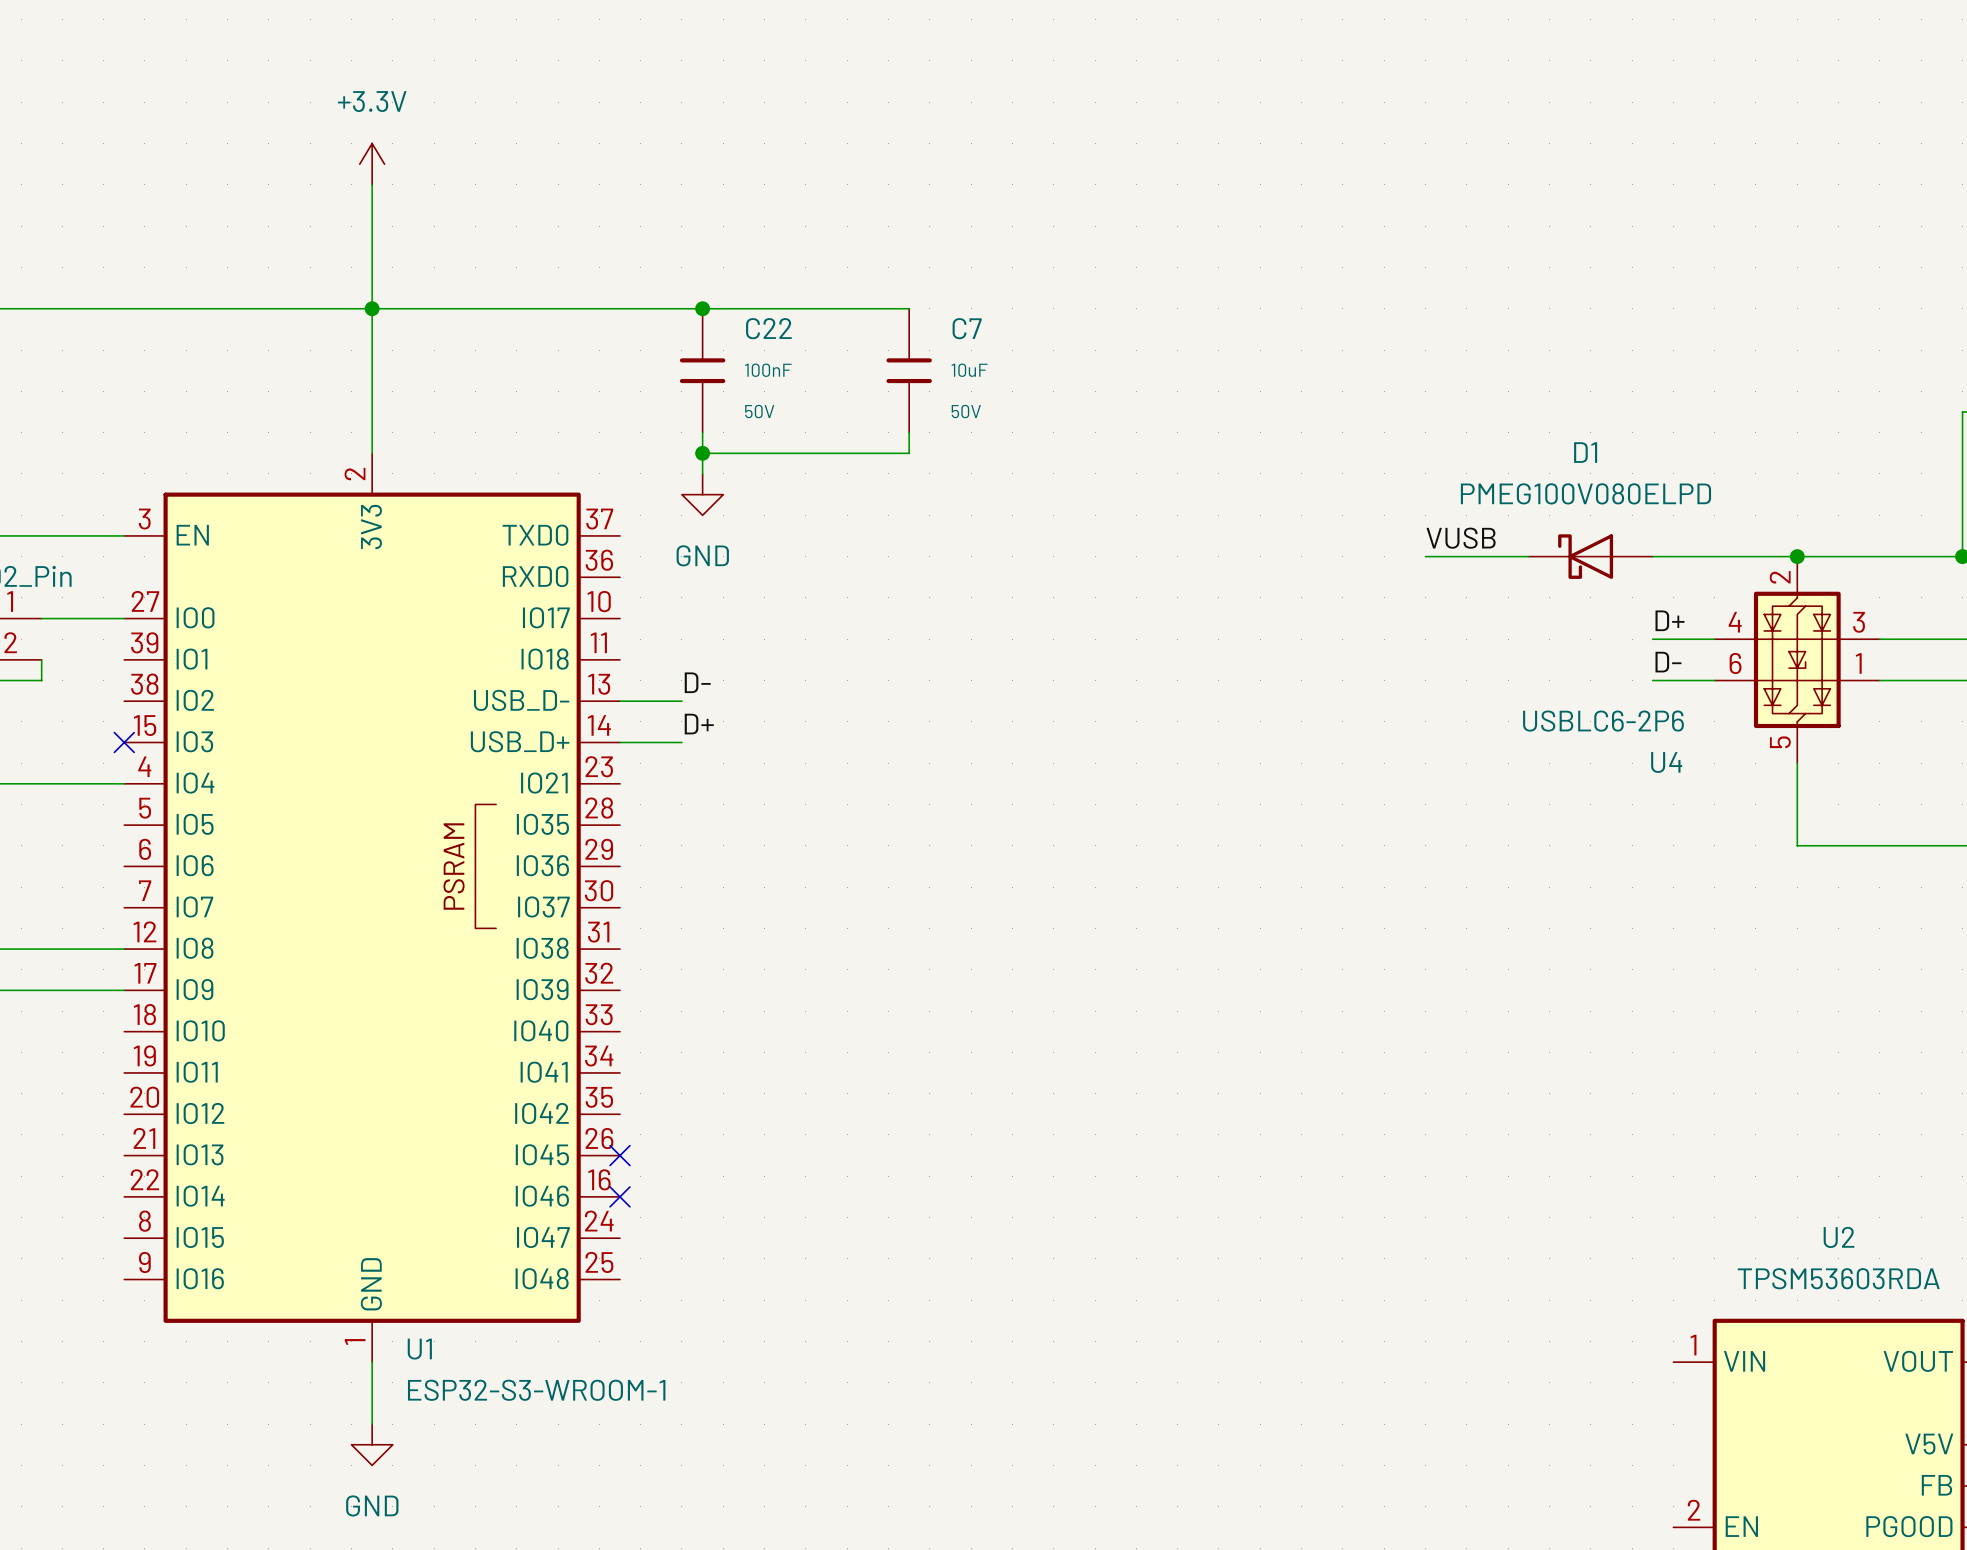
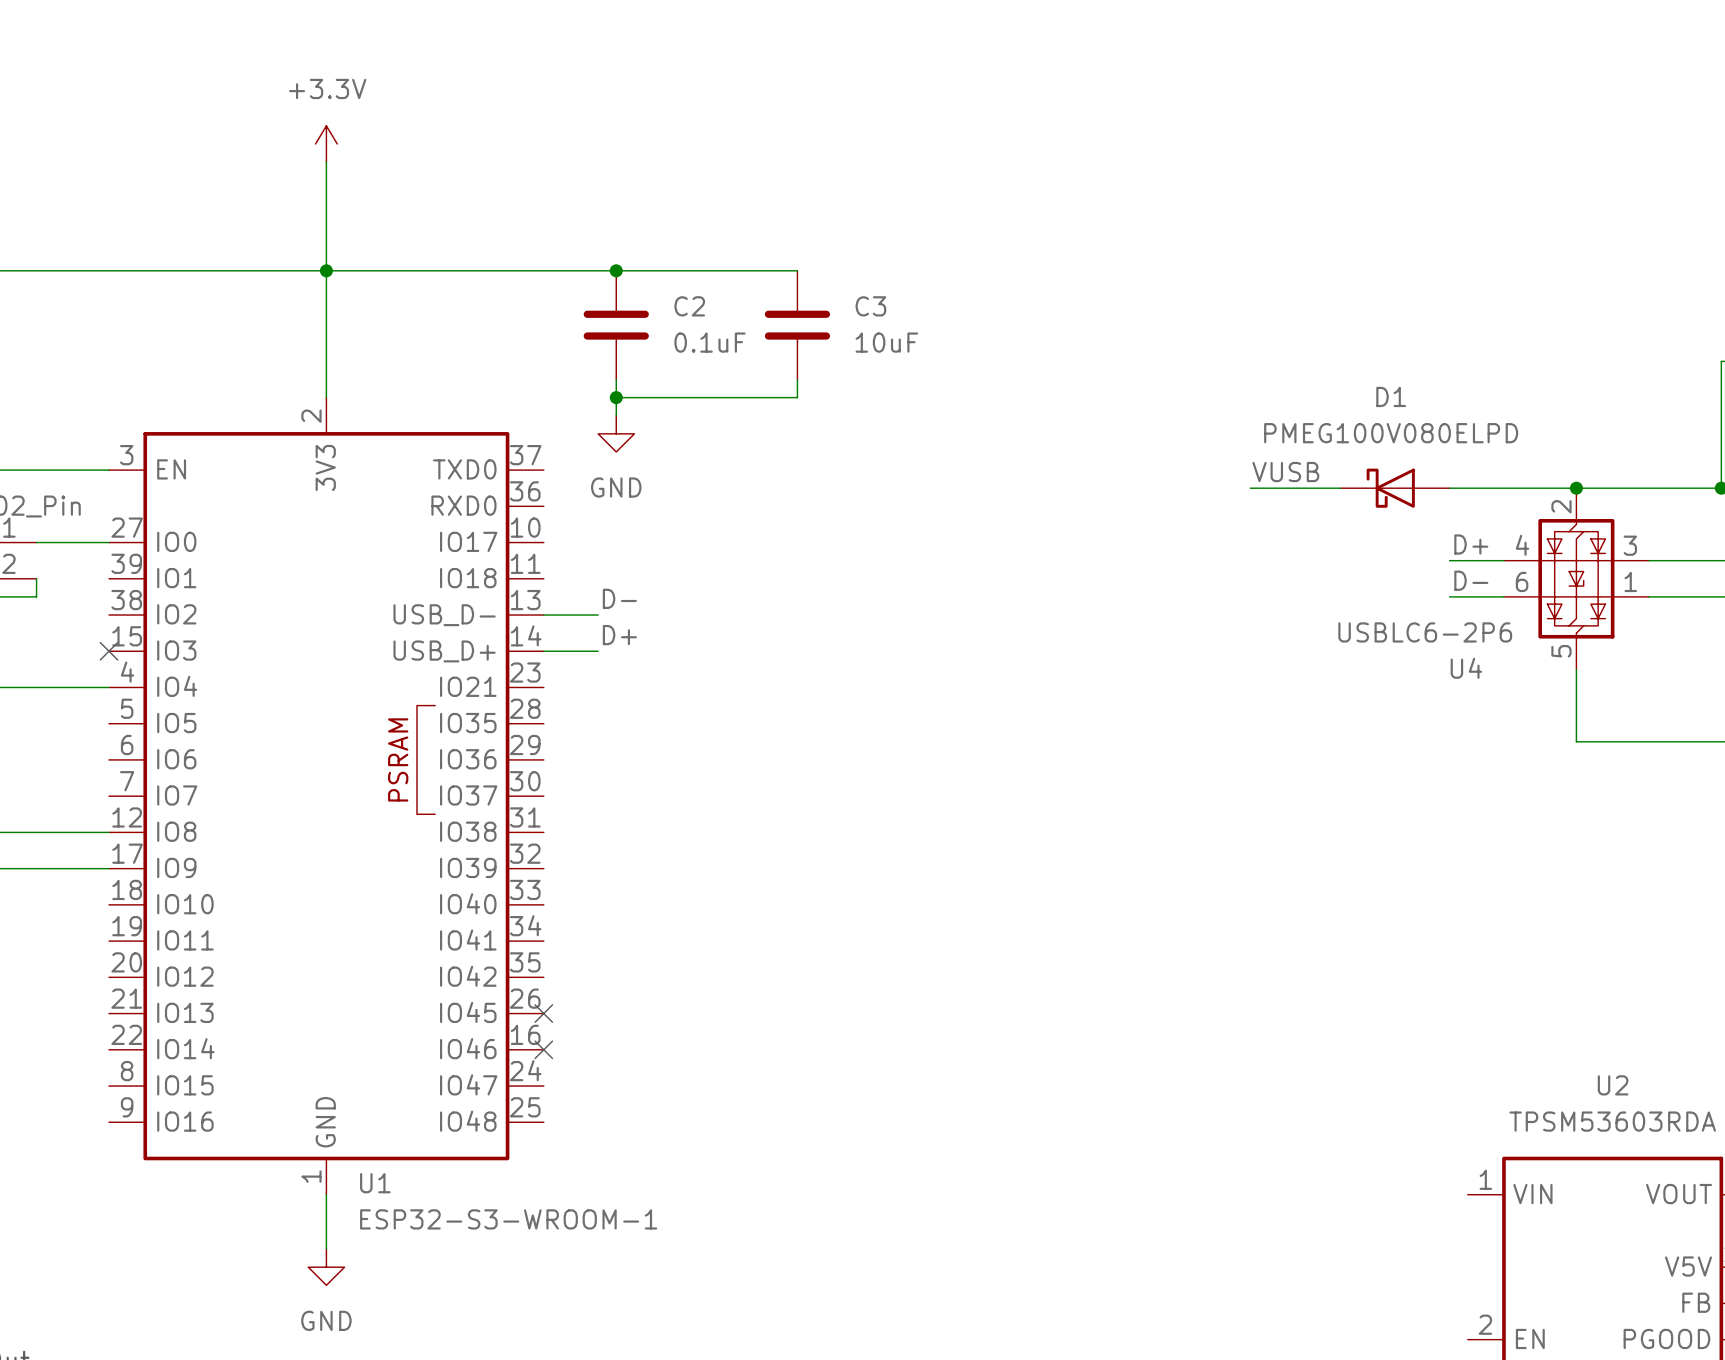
C22: 100nF (702, 370) -> none
C2: none -> 0.1uF (616, 325)
C7: 10uF (909, 370) -> none
C3: none -> 10uF (797, 325)

